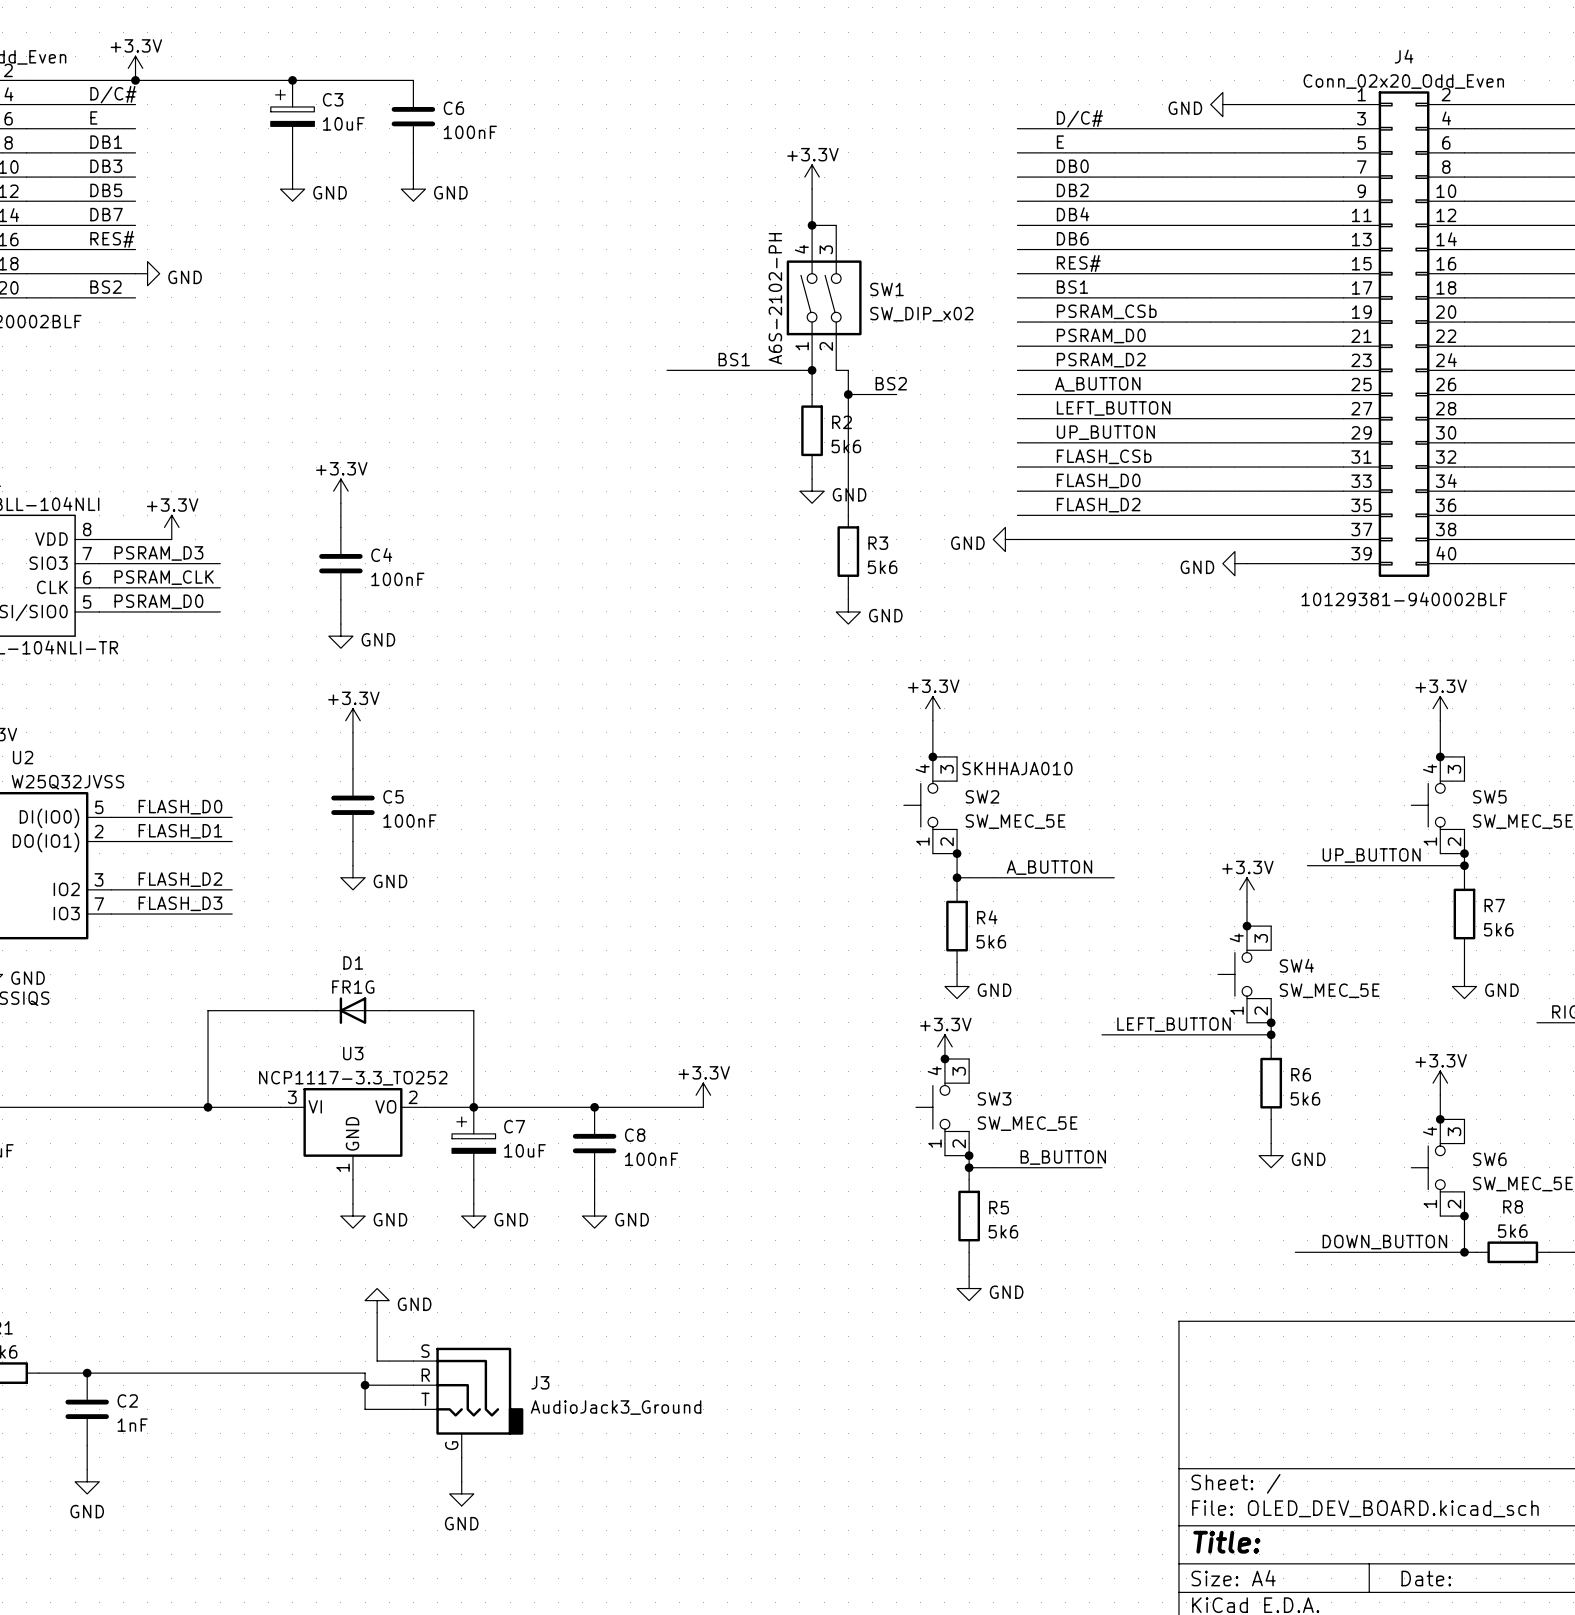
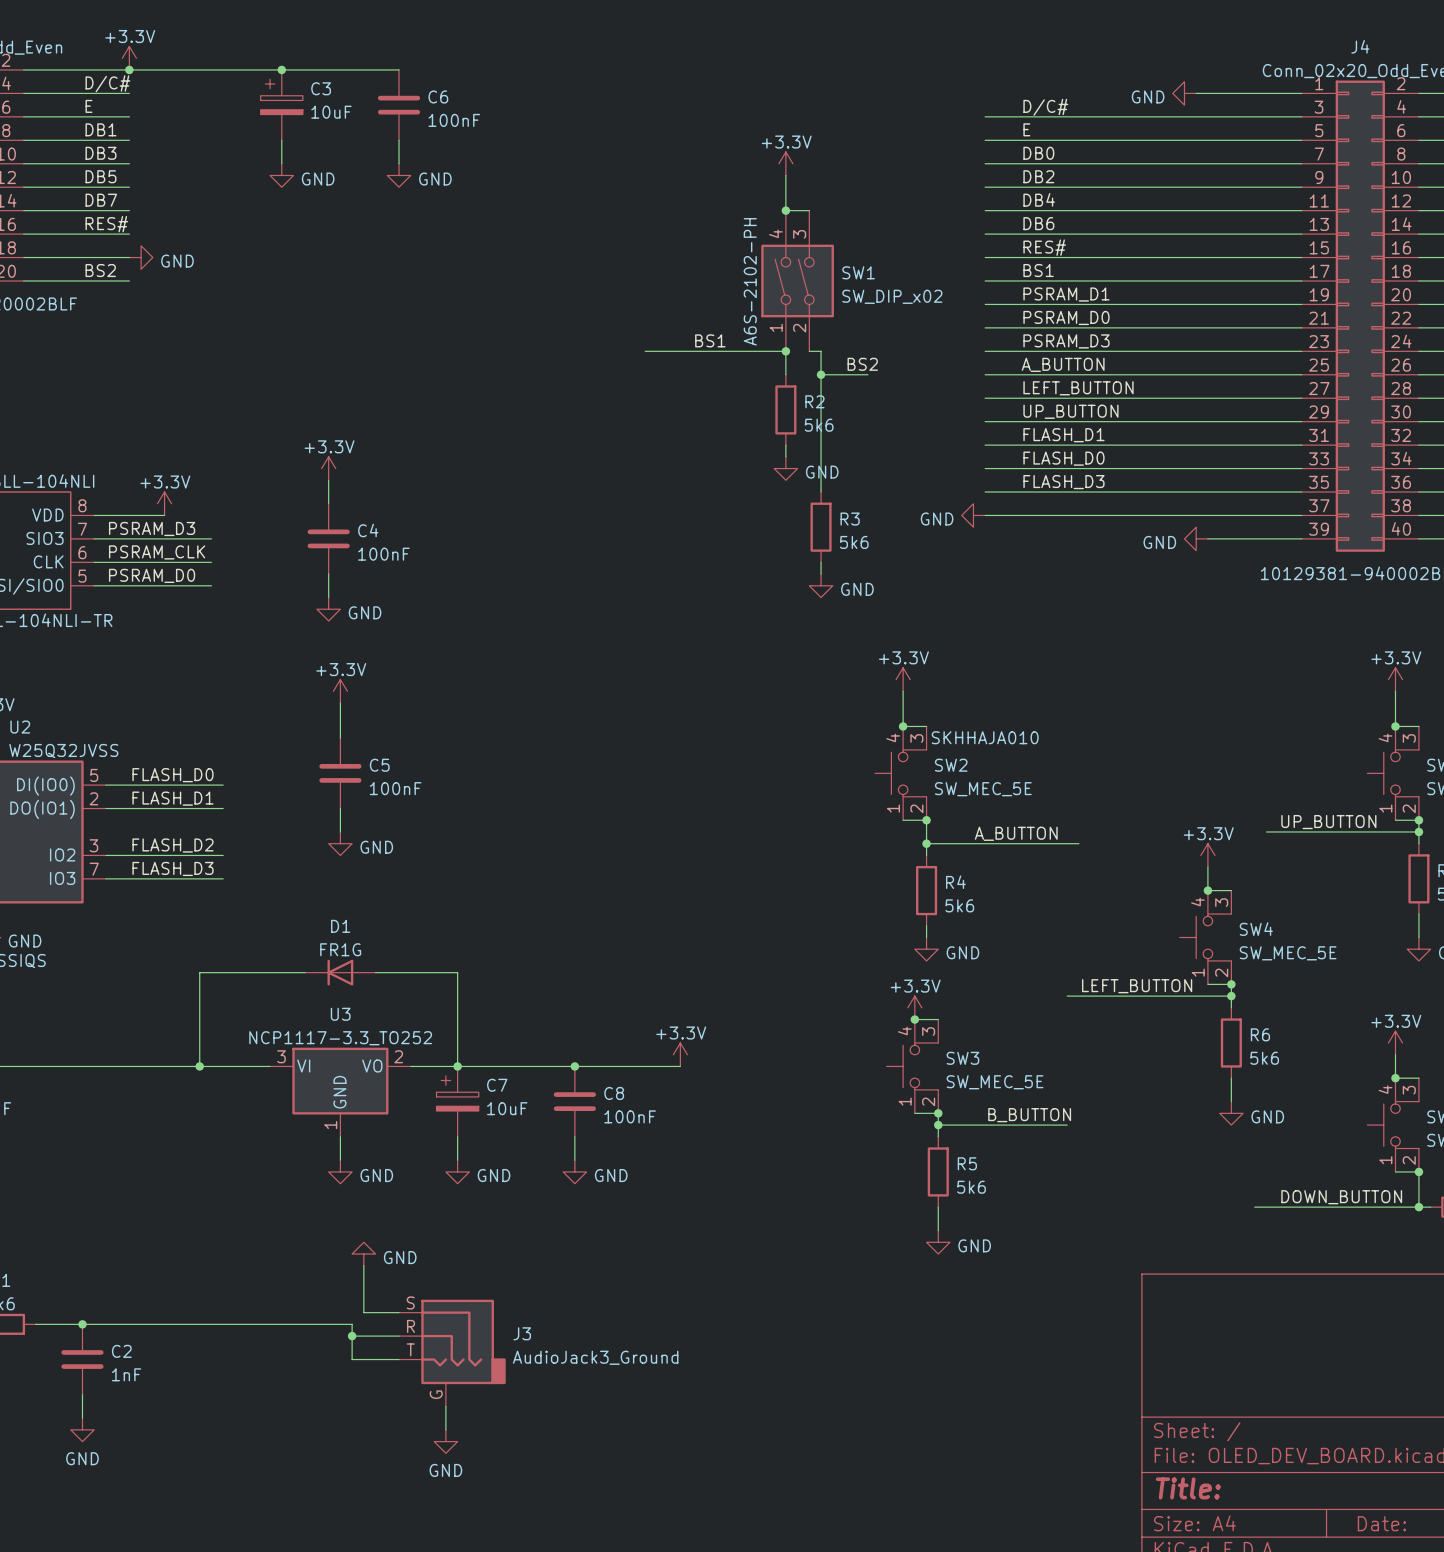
label: PSRAM_CSb (1106, 311) -> PSRAM_D1 (1066, 294)
label: PSRAM_D2 (1101, 360) -> PSRAM_D3 (1066, 341)
label: FLASH_CSb (1104, 456) -> FLASH_D1 (1063, 435)
label: FLASH_D2 (1098, 505) -> FLASH_D3 (1063, 482)

